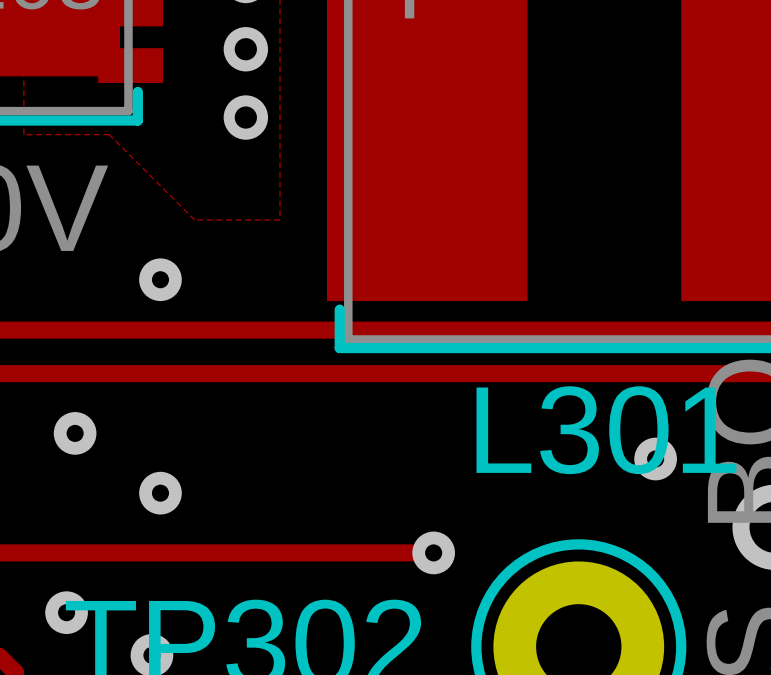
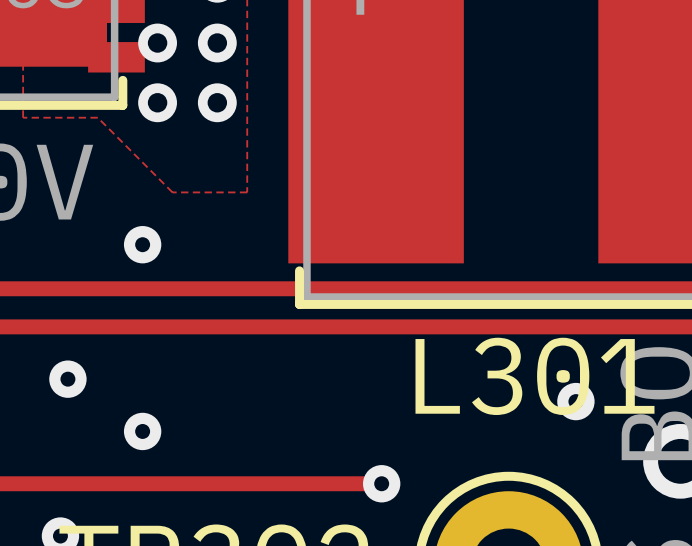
via: none -> (157, 43)
via: none -> (157, 102)

